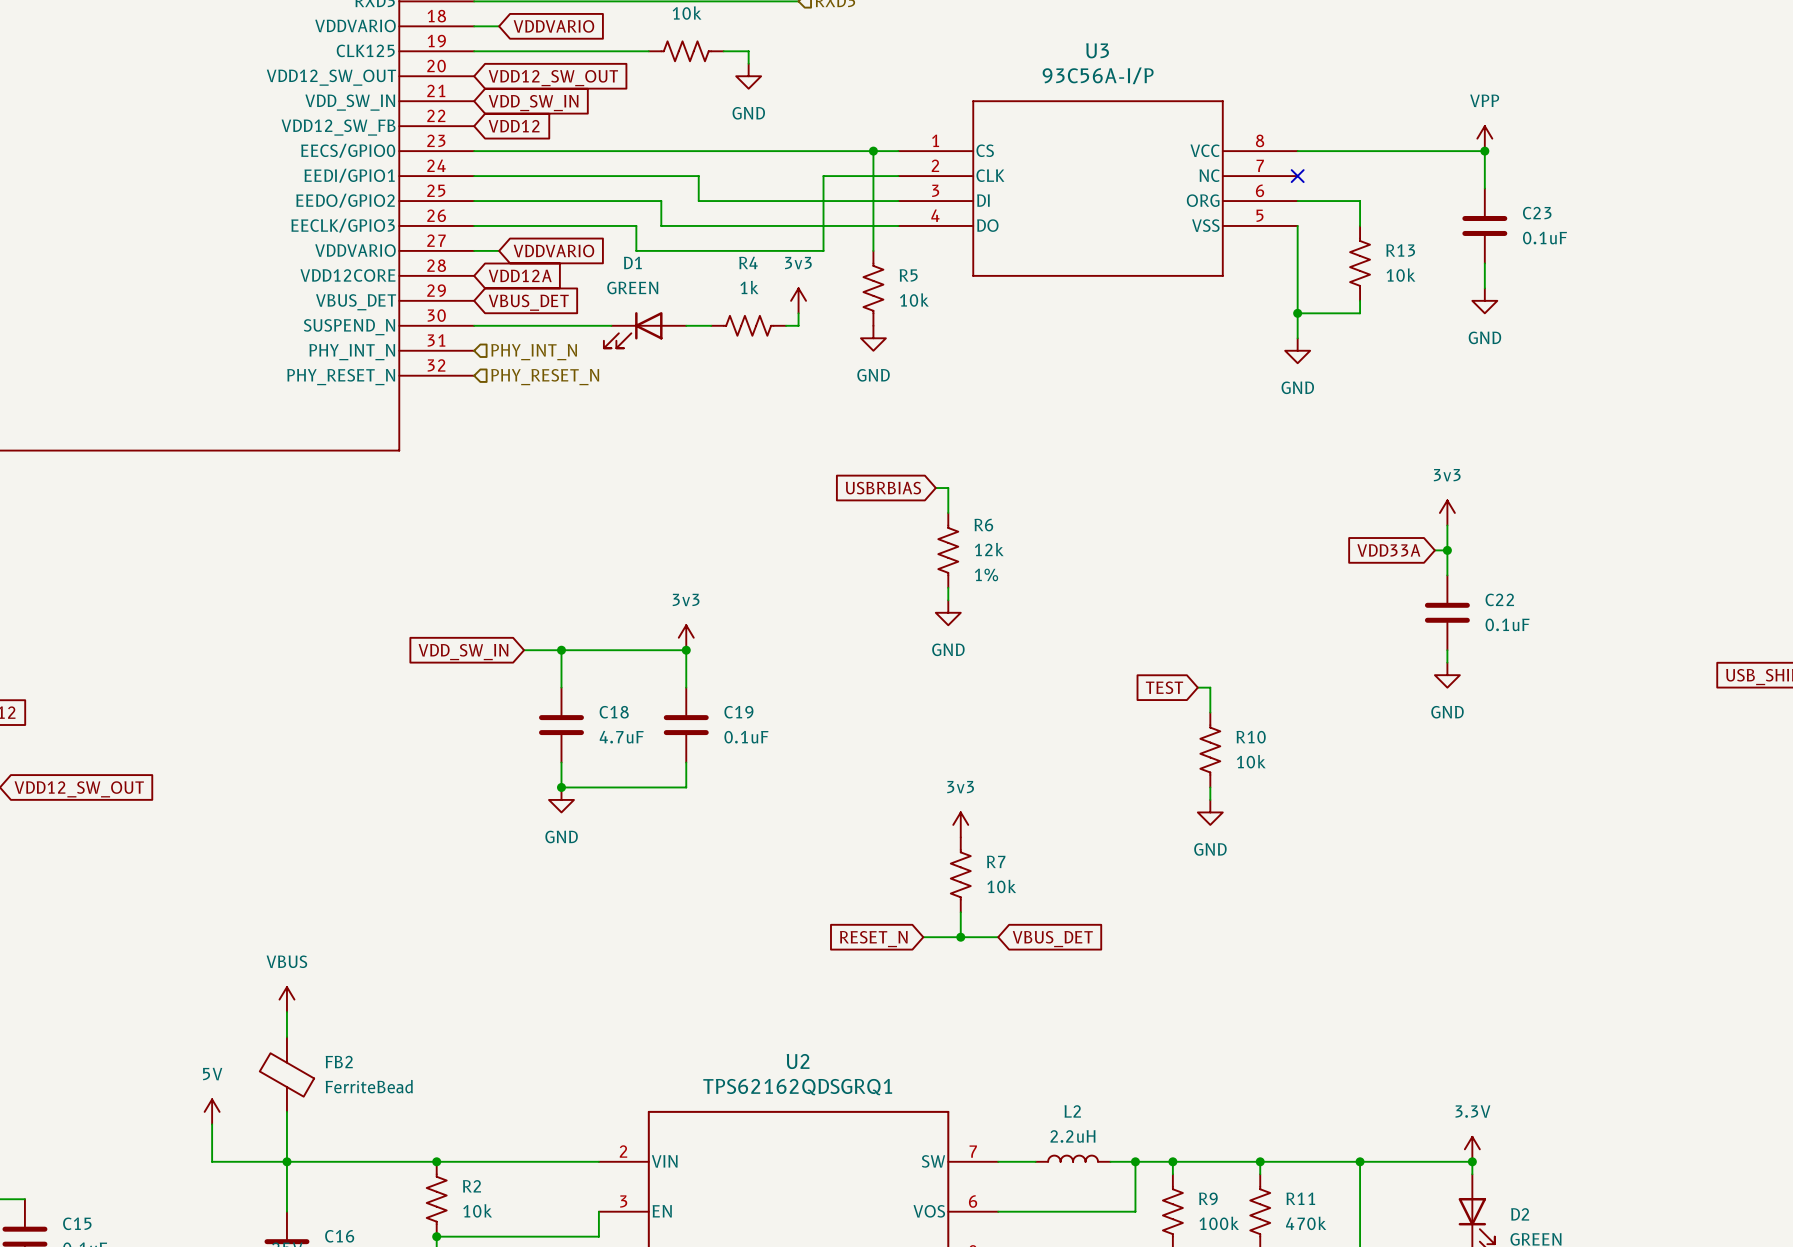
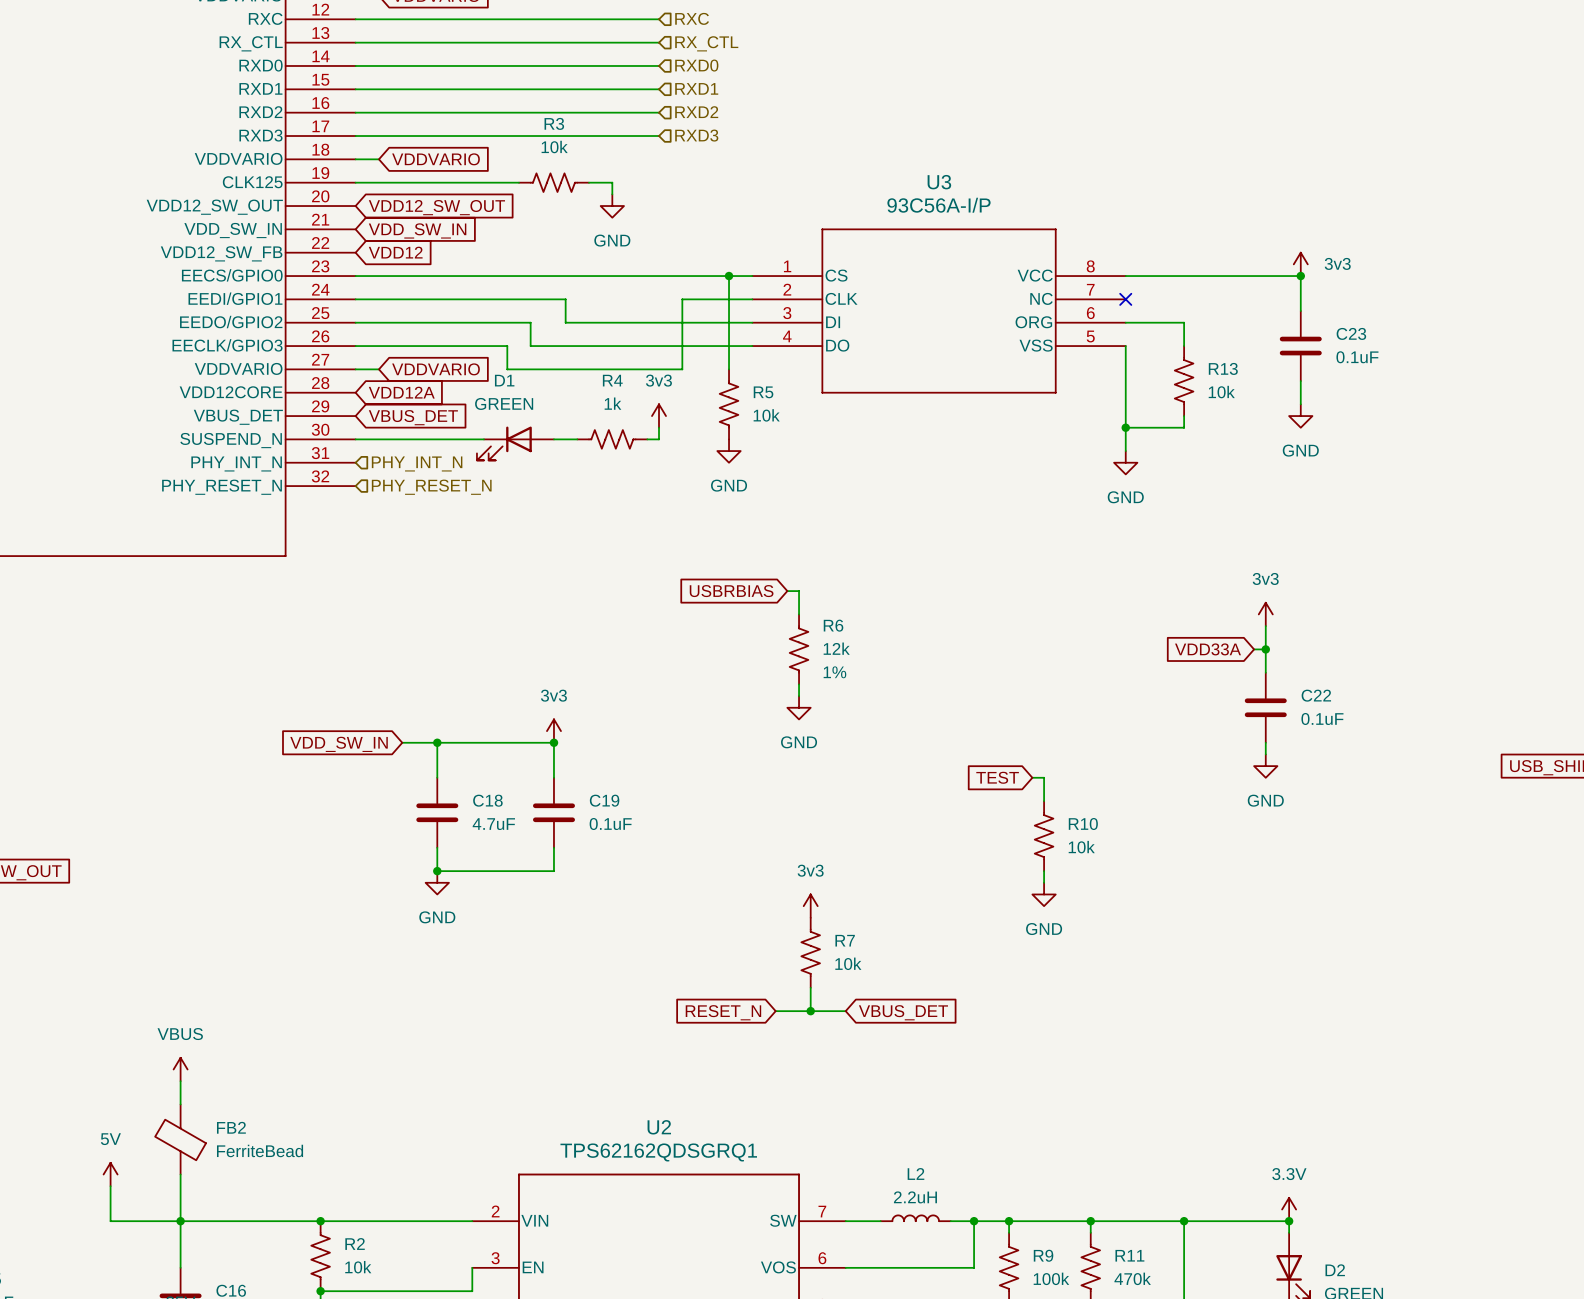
power symbol: VPP (1484, 138) -> 3v3 (1300, 264)

